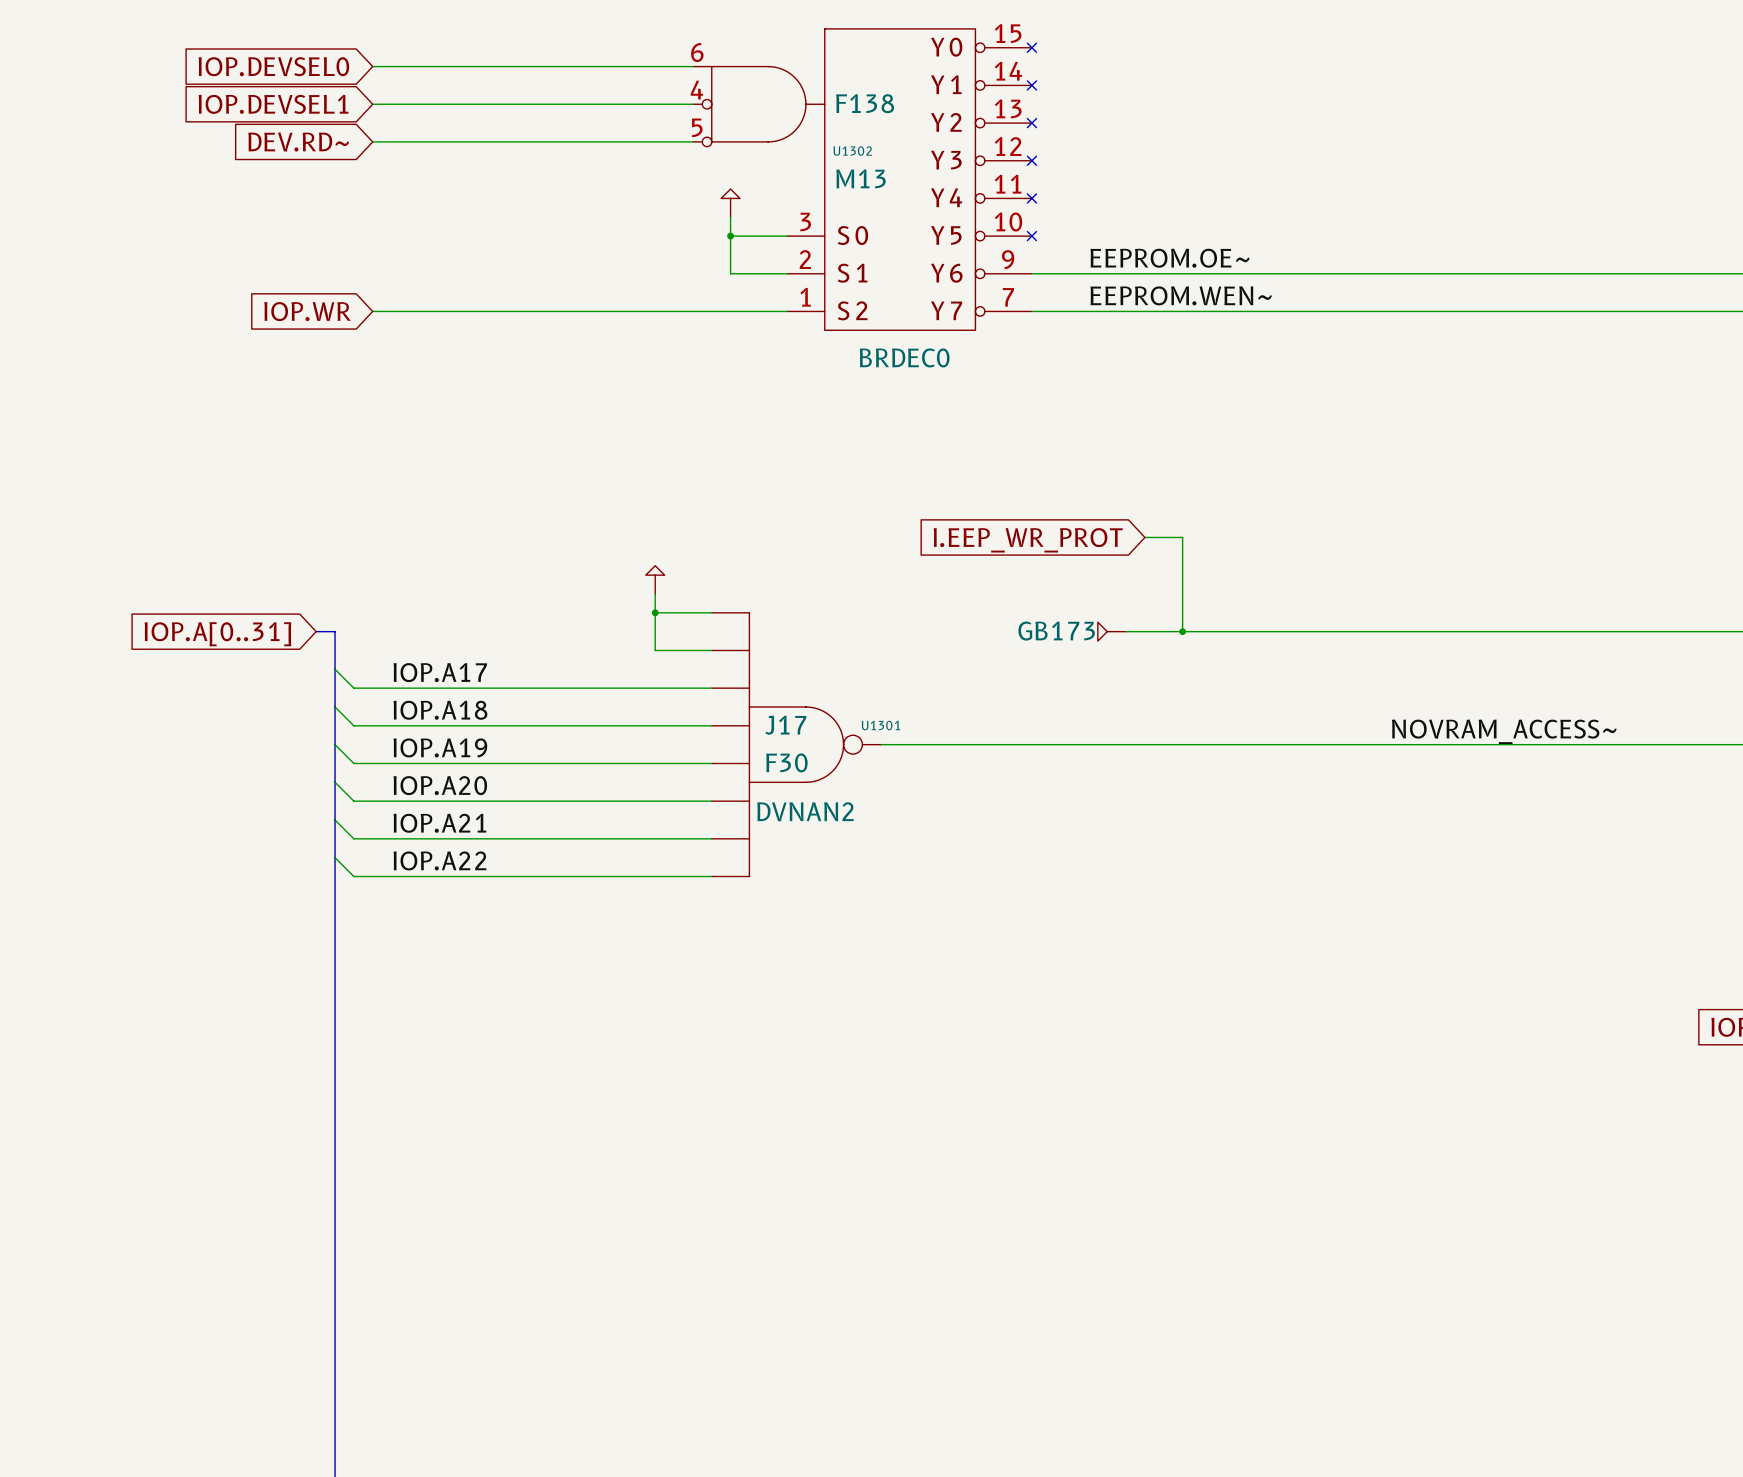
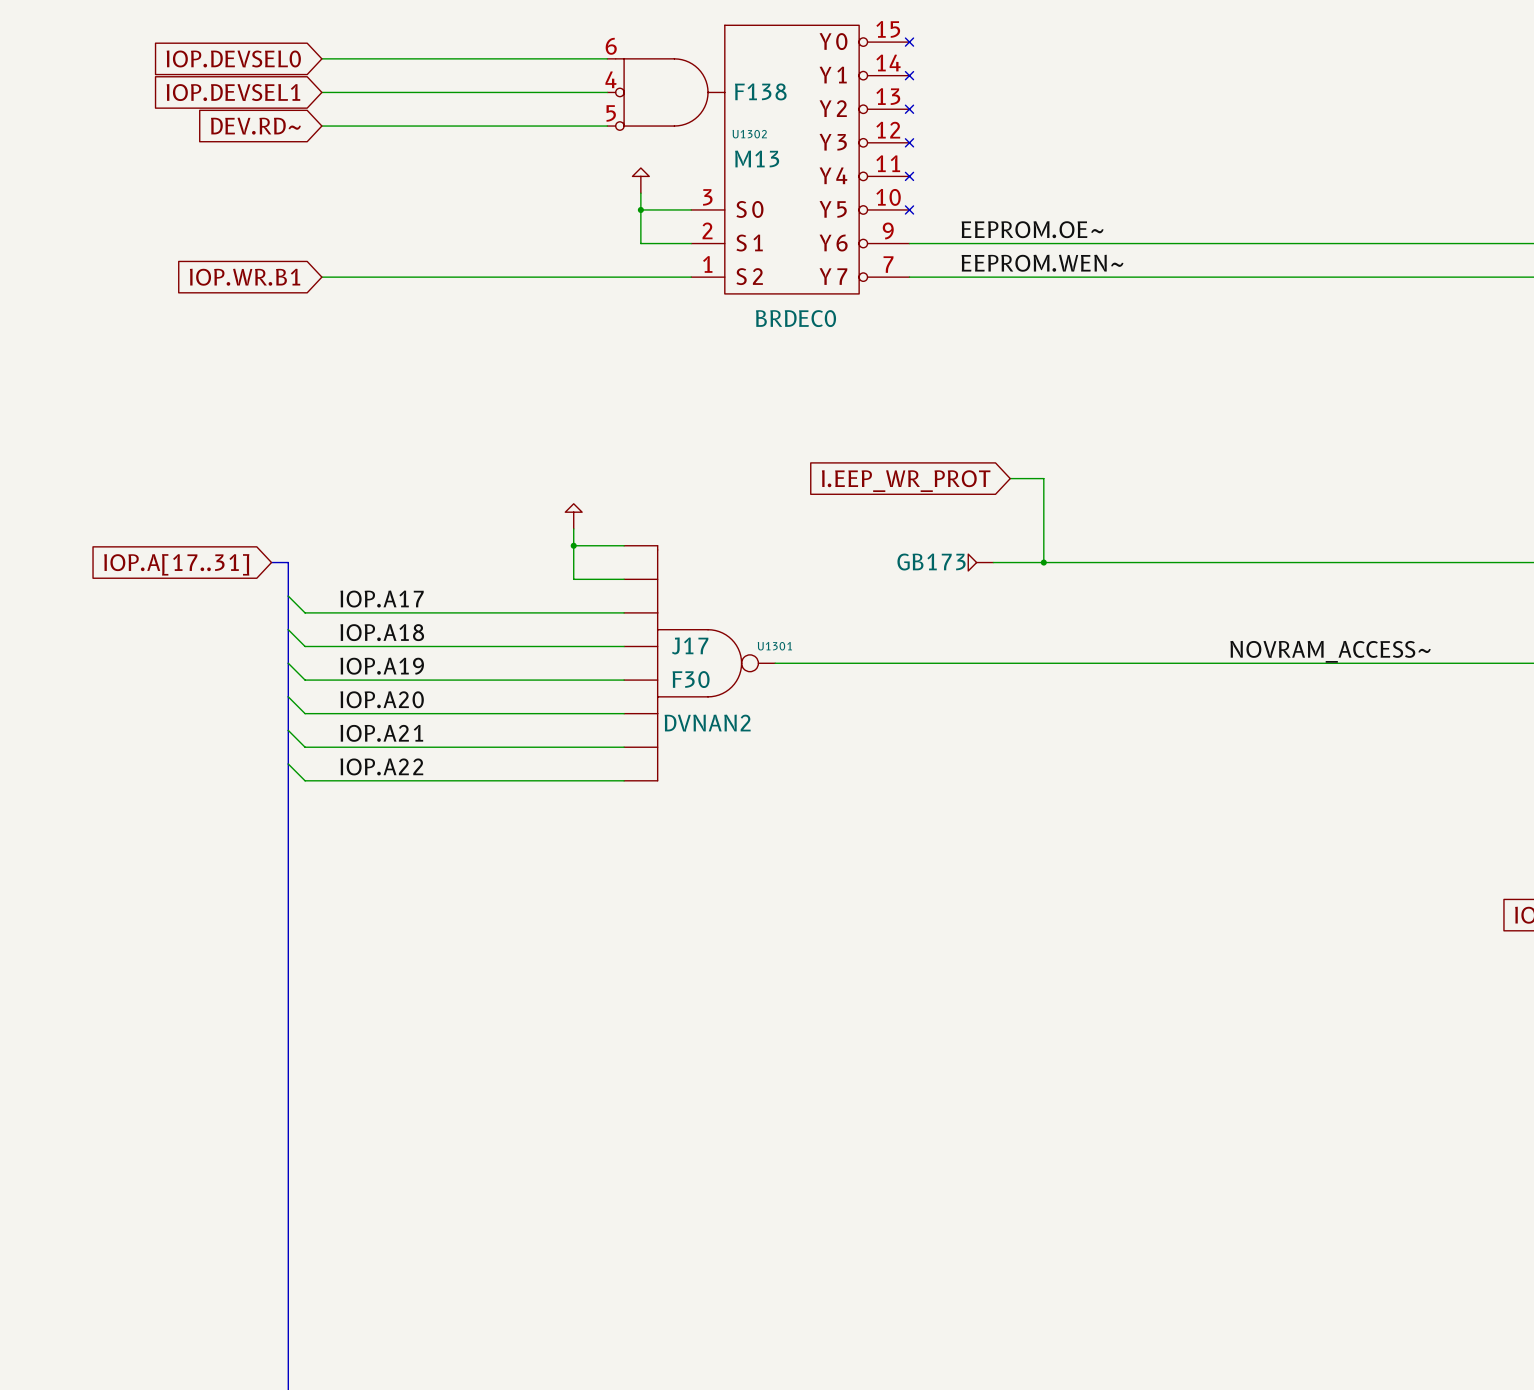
global label: IOP.WR (307, 311) -> IOP.WR.B1 (245, 277)
global label: IOP.A[0..31] (217, 634) -> IOP.A[17..31] (176, 564)

